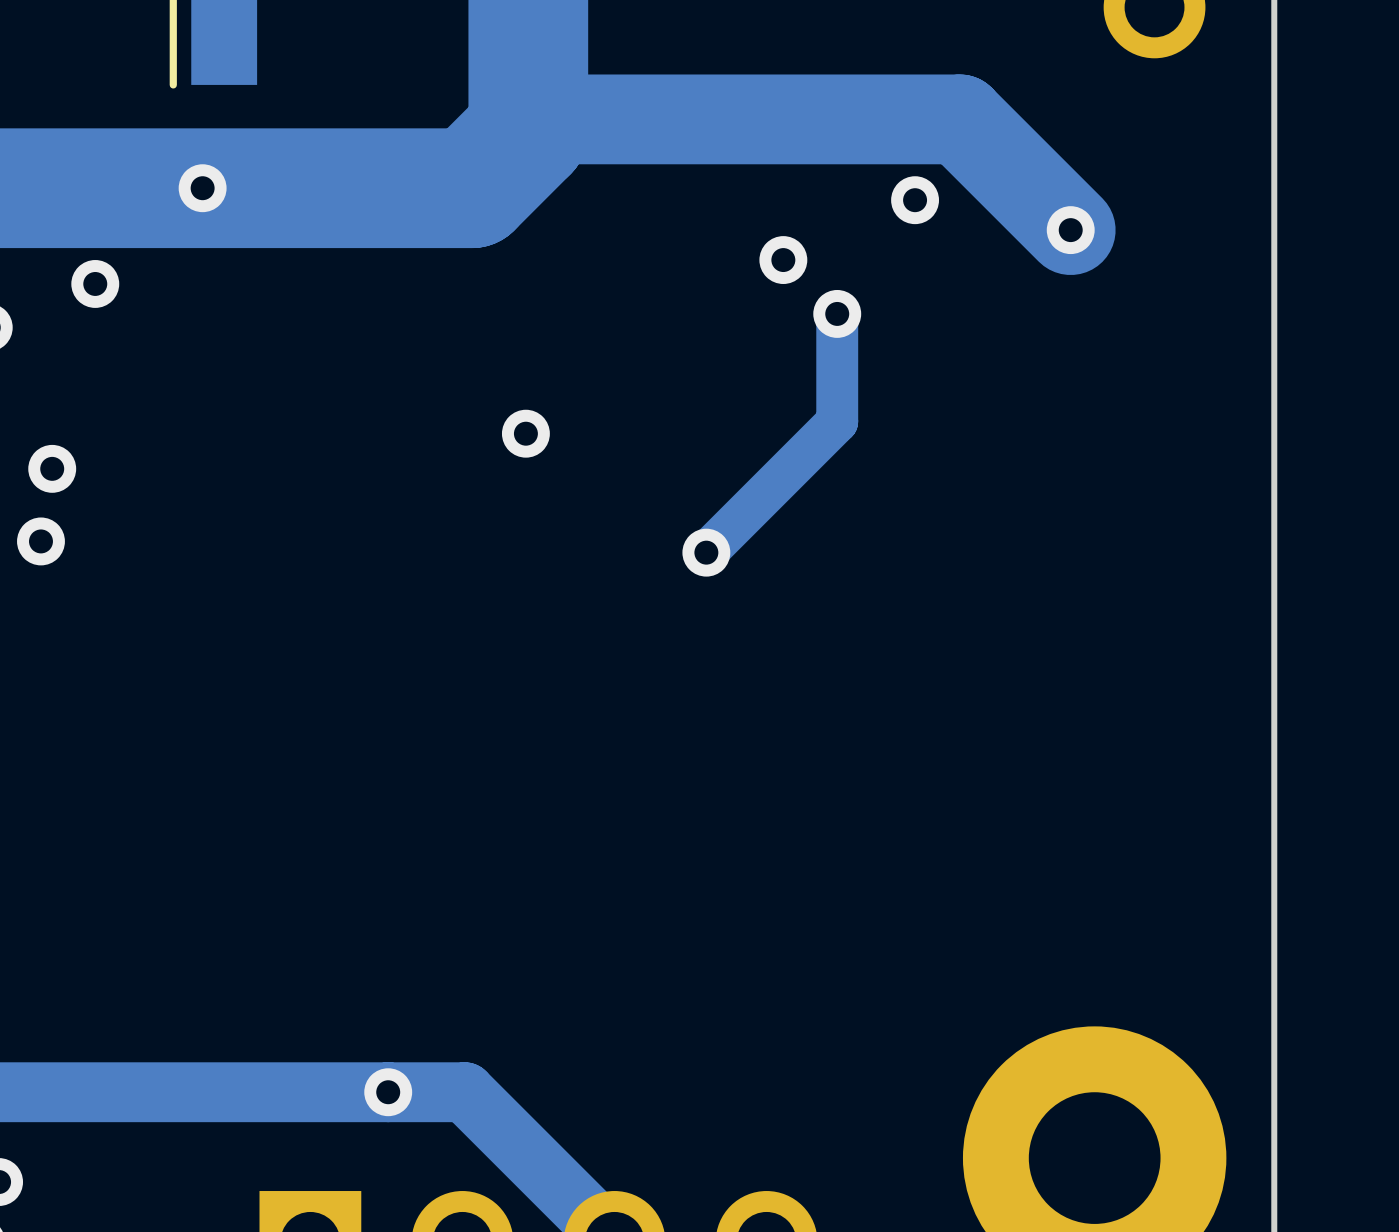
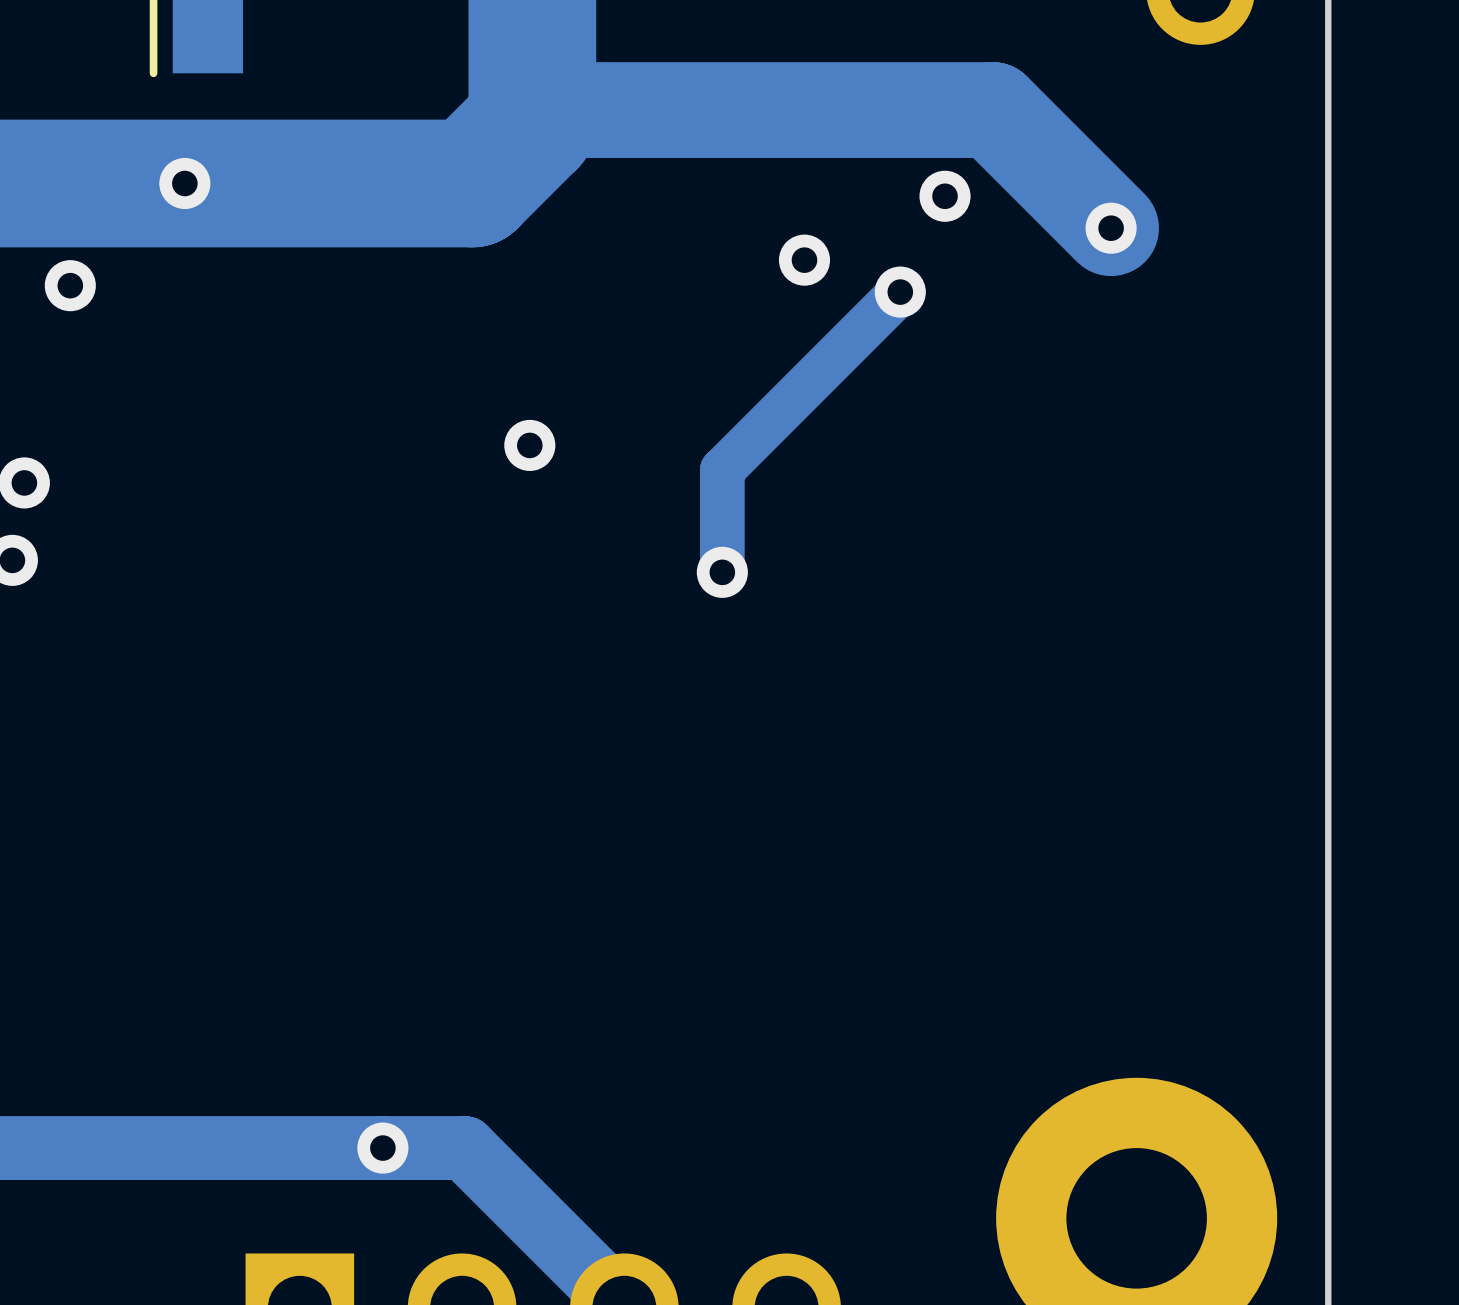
track: (837, 313) (837, 421) (706, 552) -> (900, 292) (722, 470) (722, 572)
via position: (837, 313) -> (900, 292)

